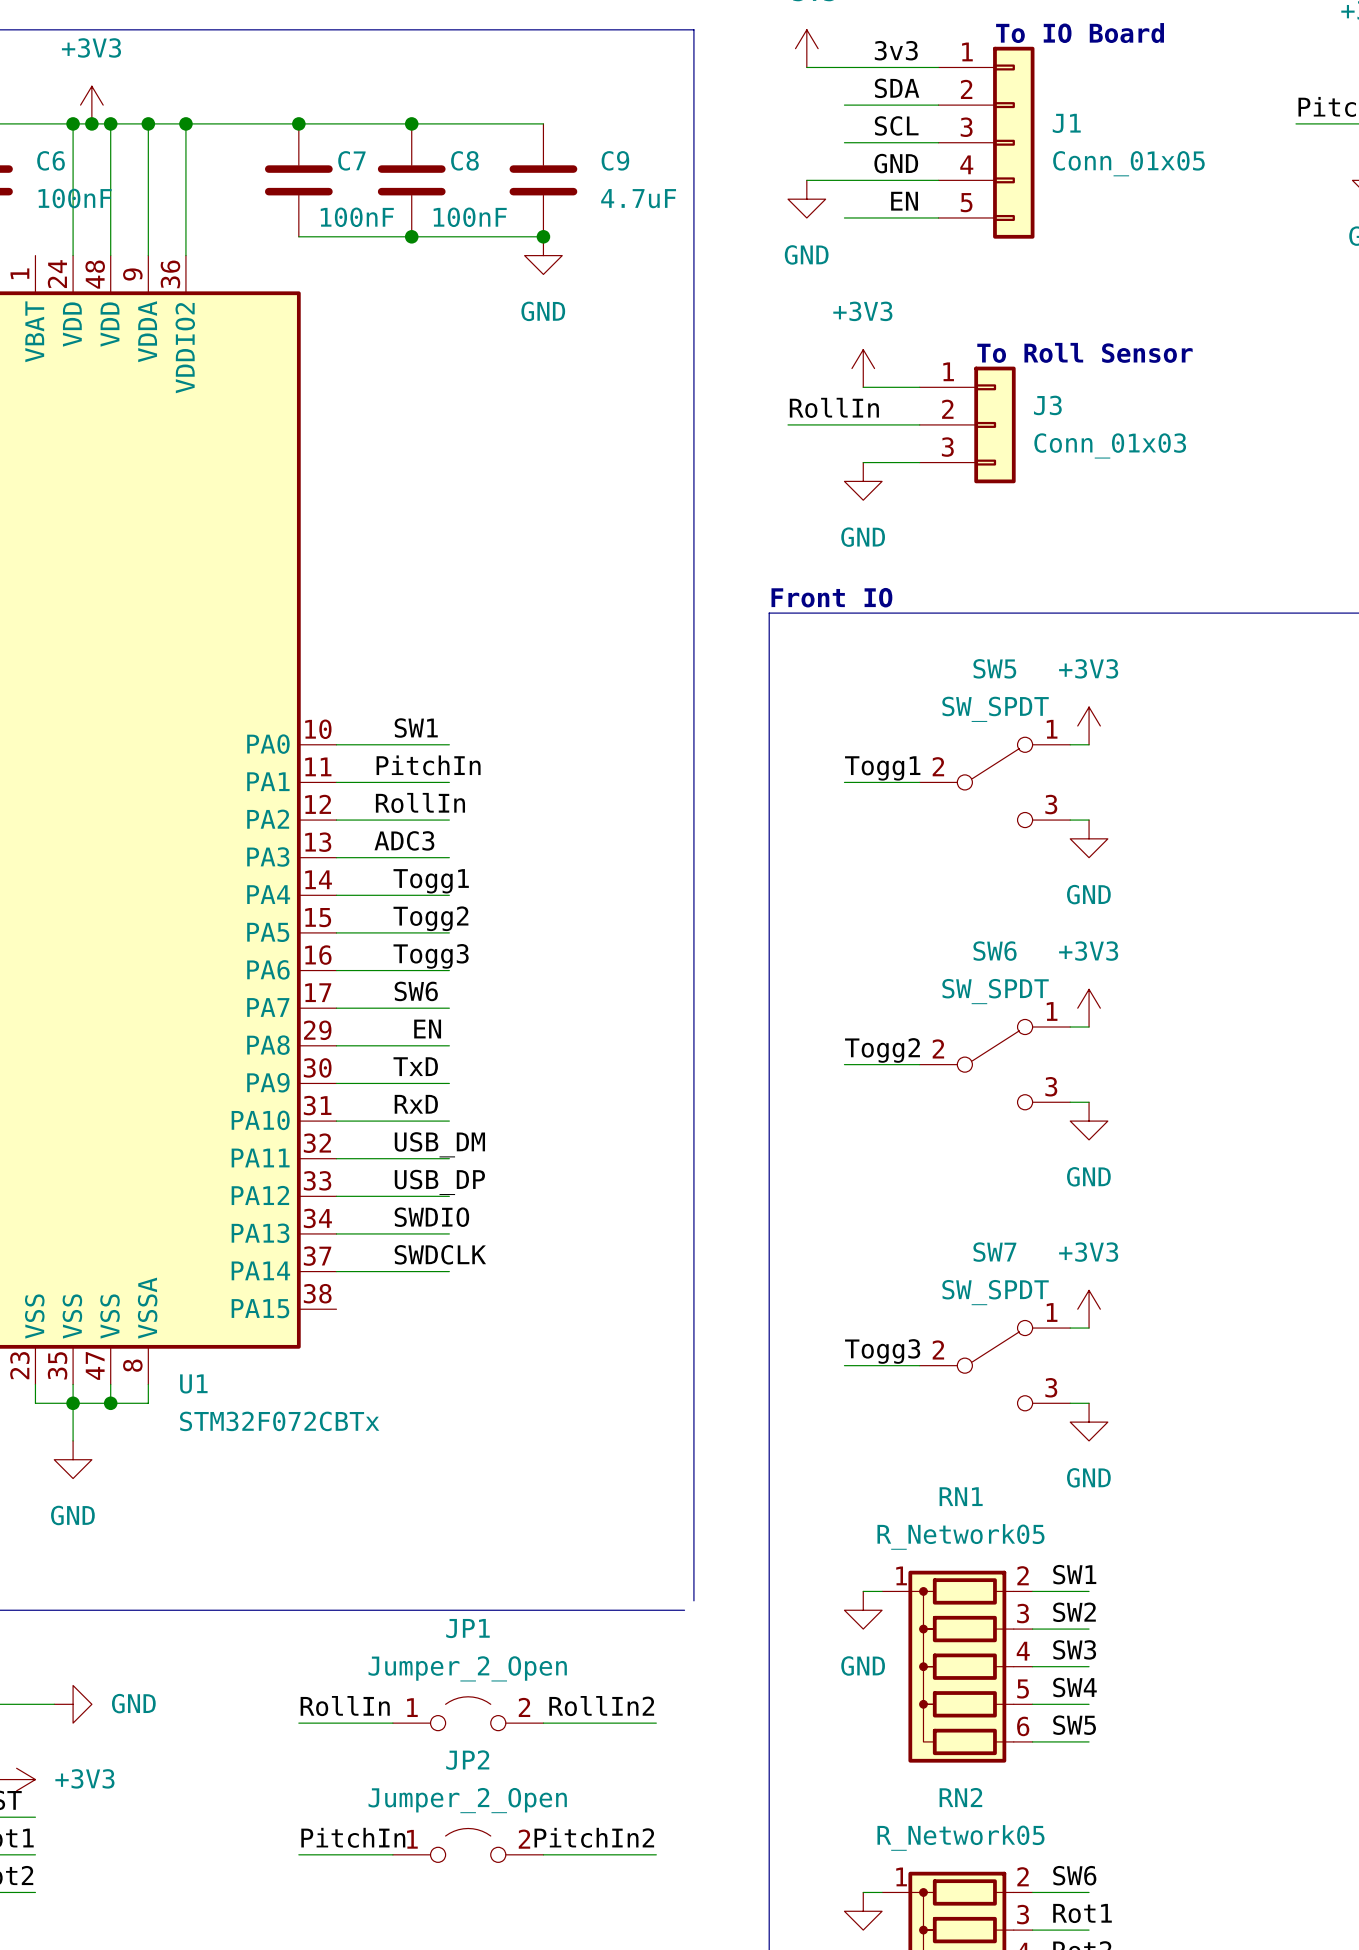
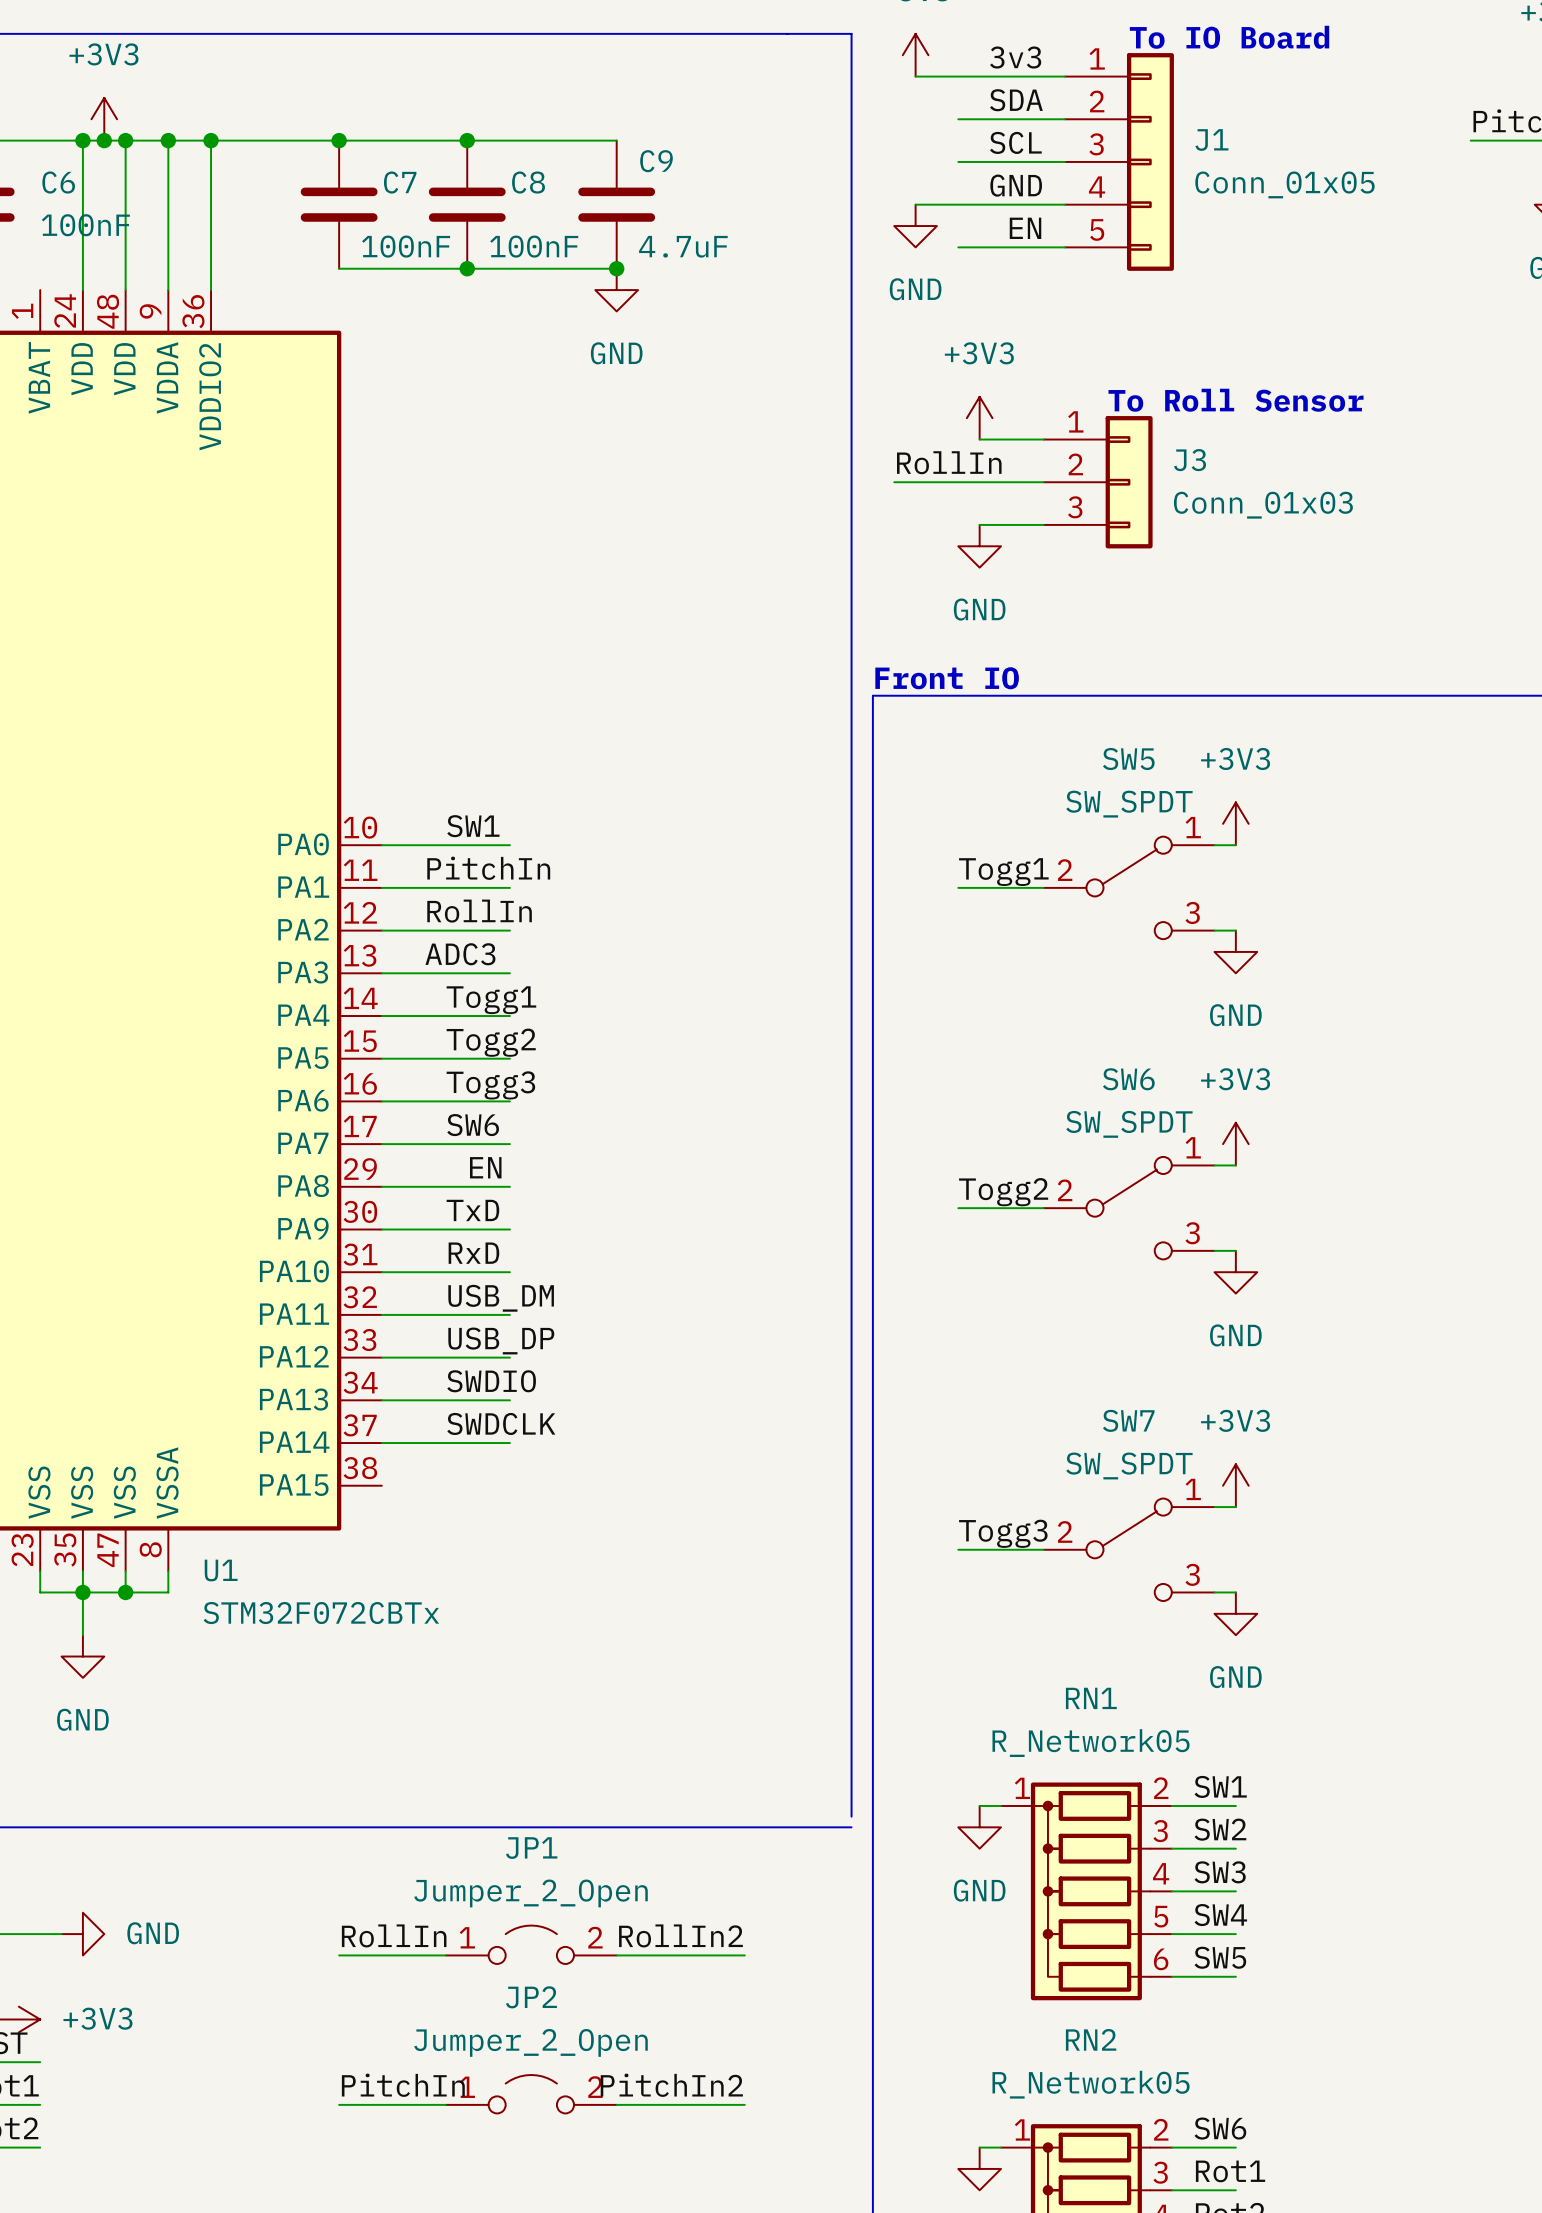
line: (693, 29) (693, 1600) -> (787, 33) (851, 33) (851, 1816)
C9 name position: C9 (615, 160) -> C9 (656, 161)
C9 value position: 4.7uF (638, 198) -> 4.7uF (683, 246)
line: none -> (776, 1827) (851, 1827)

